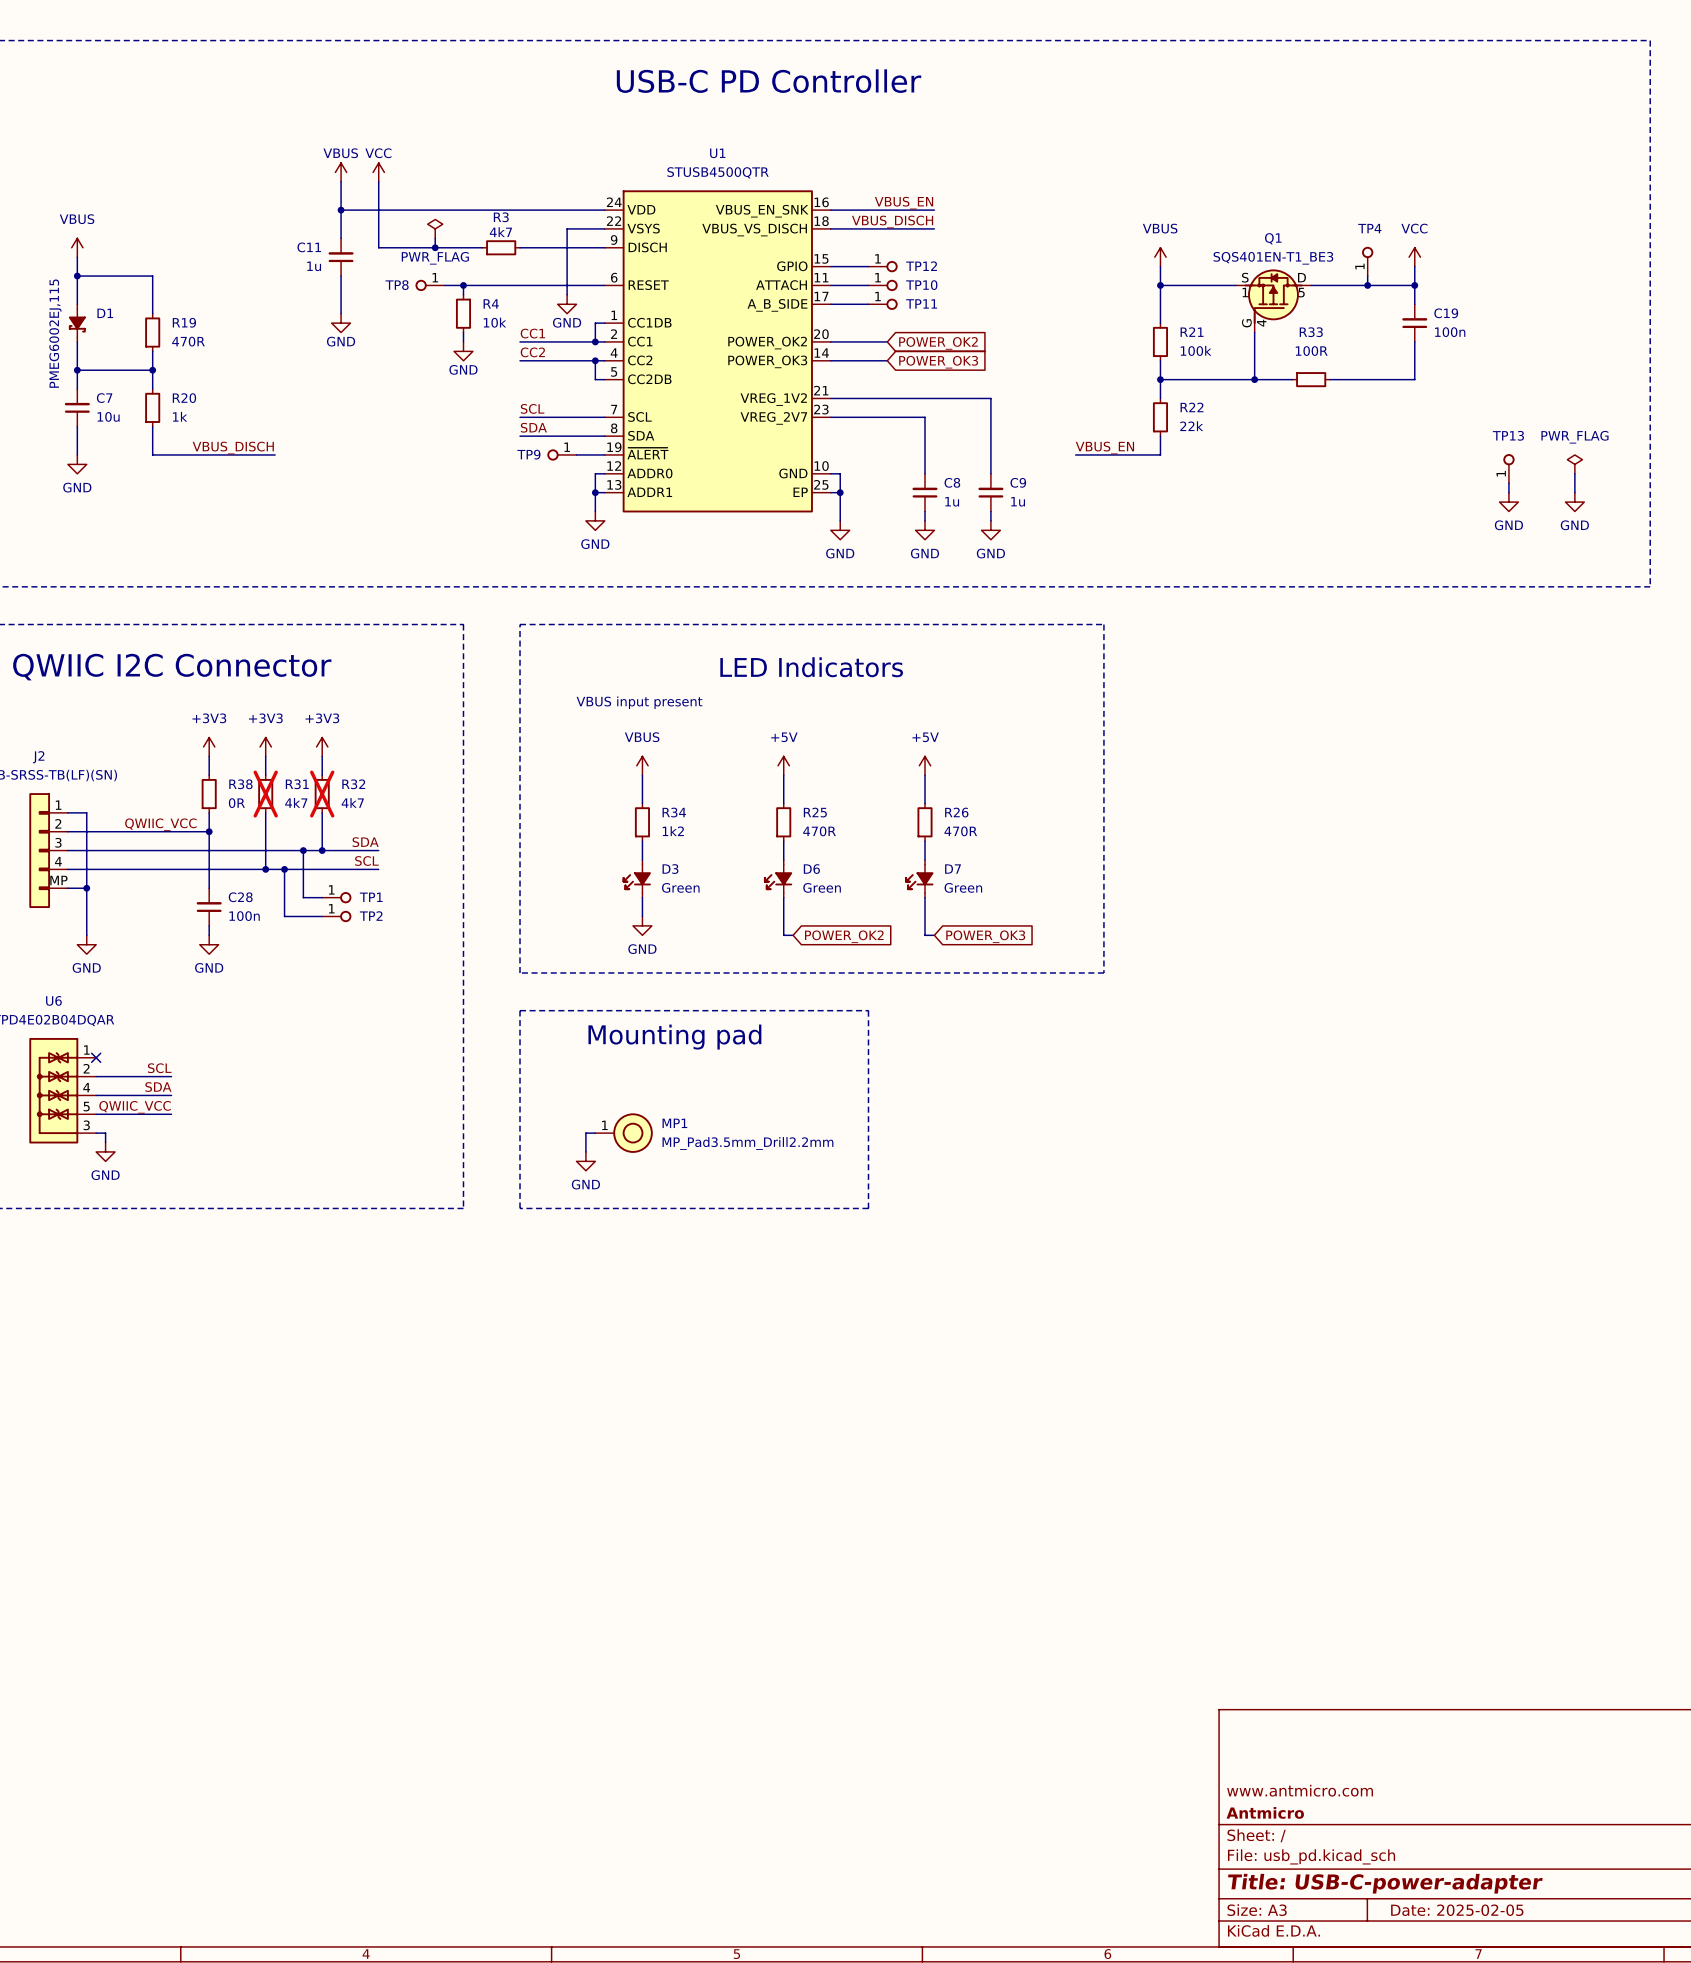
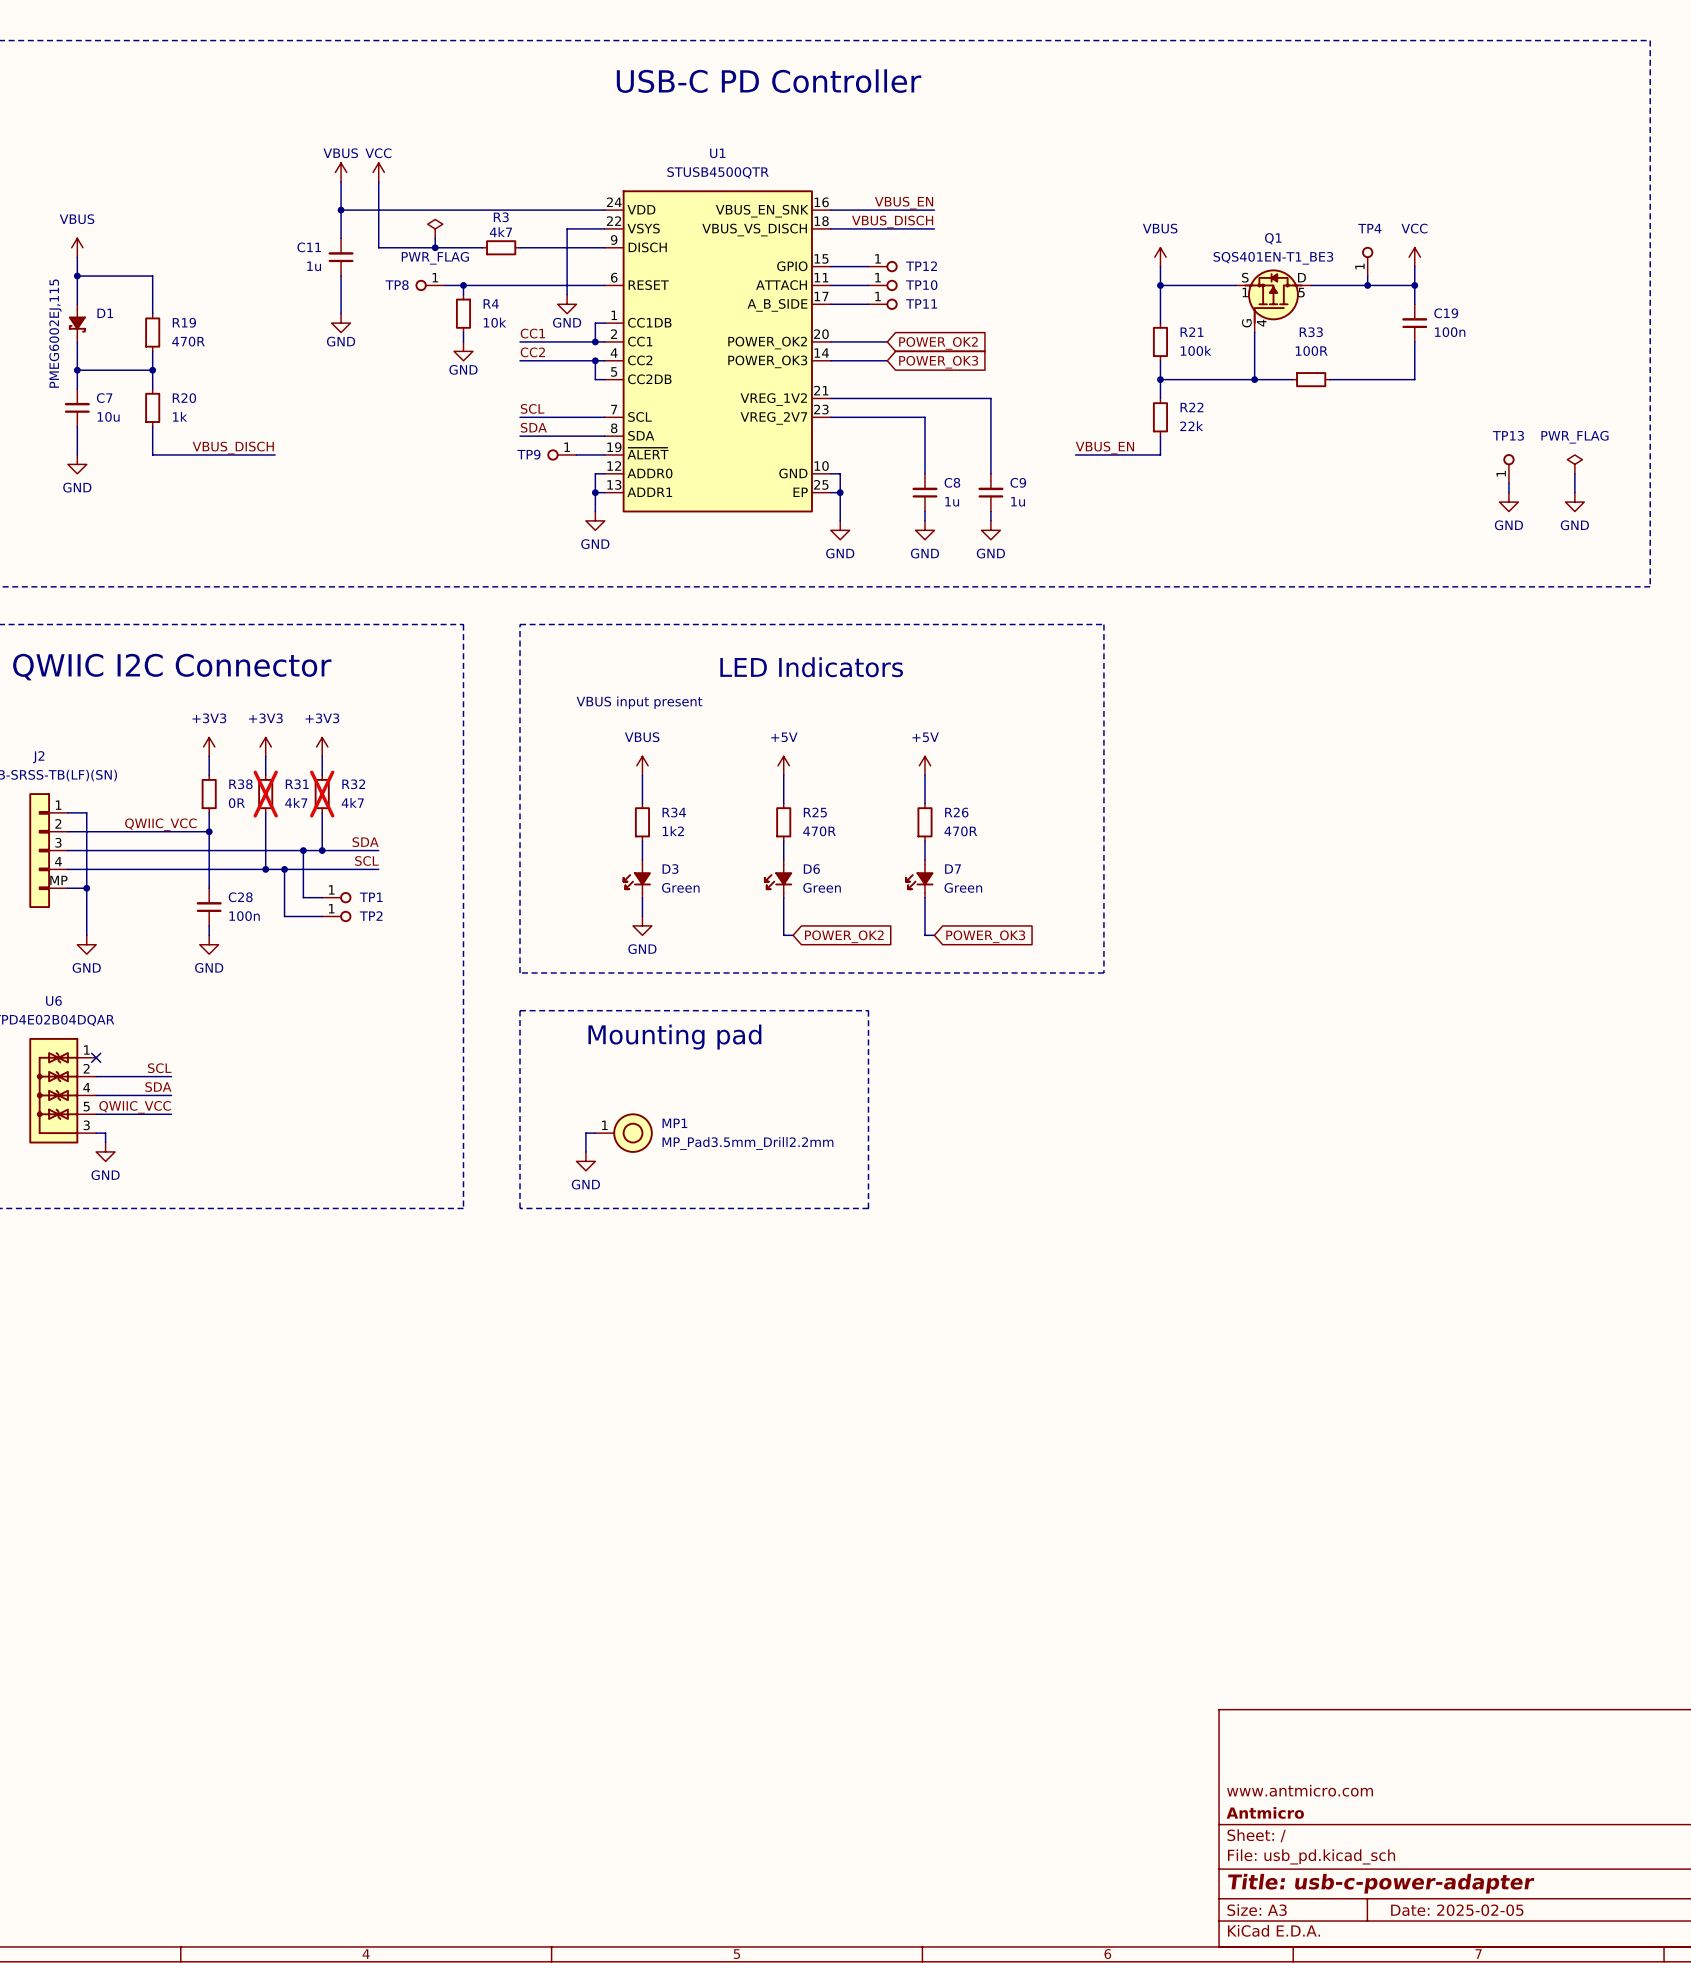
title block: Title: USB-C-power-adapter (1385, 1883) -> Title: usb-c-power-adapter (1381, 1883)

